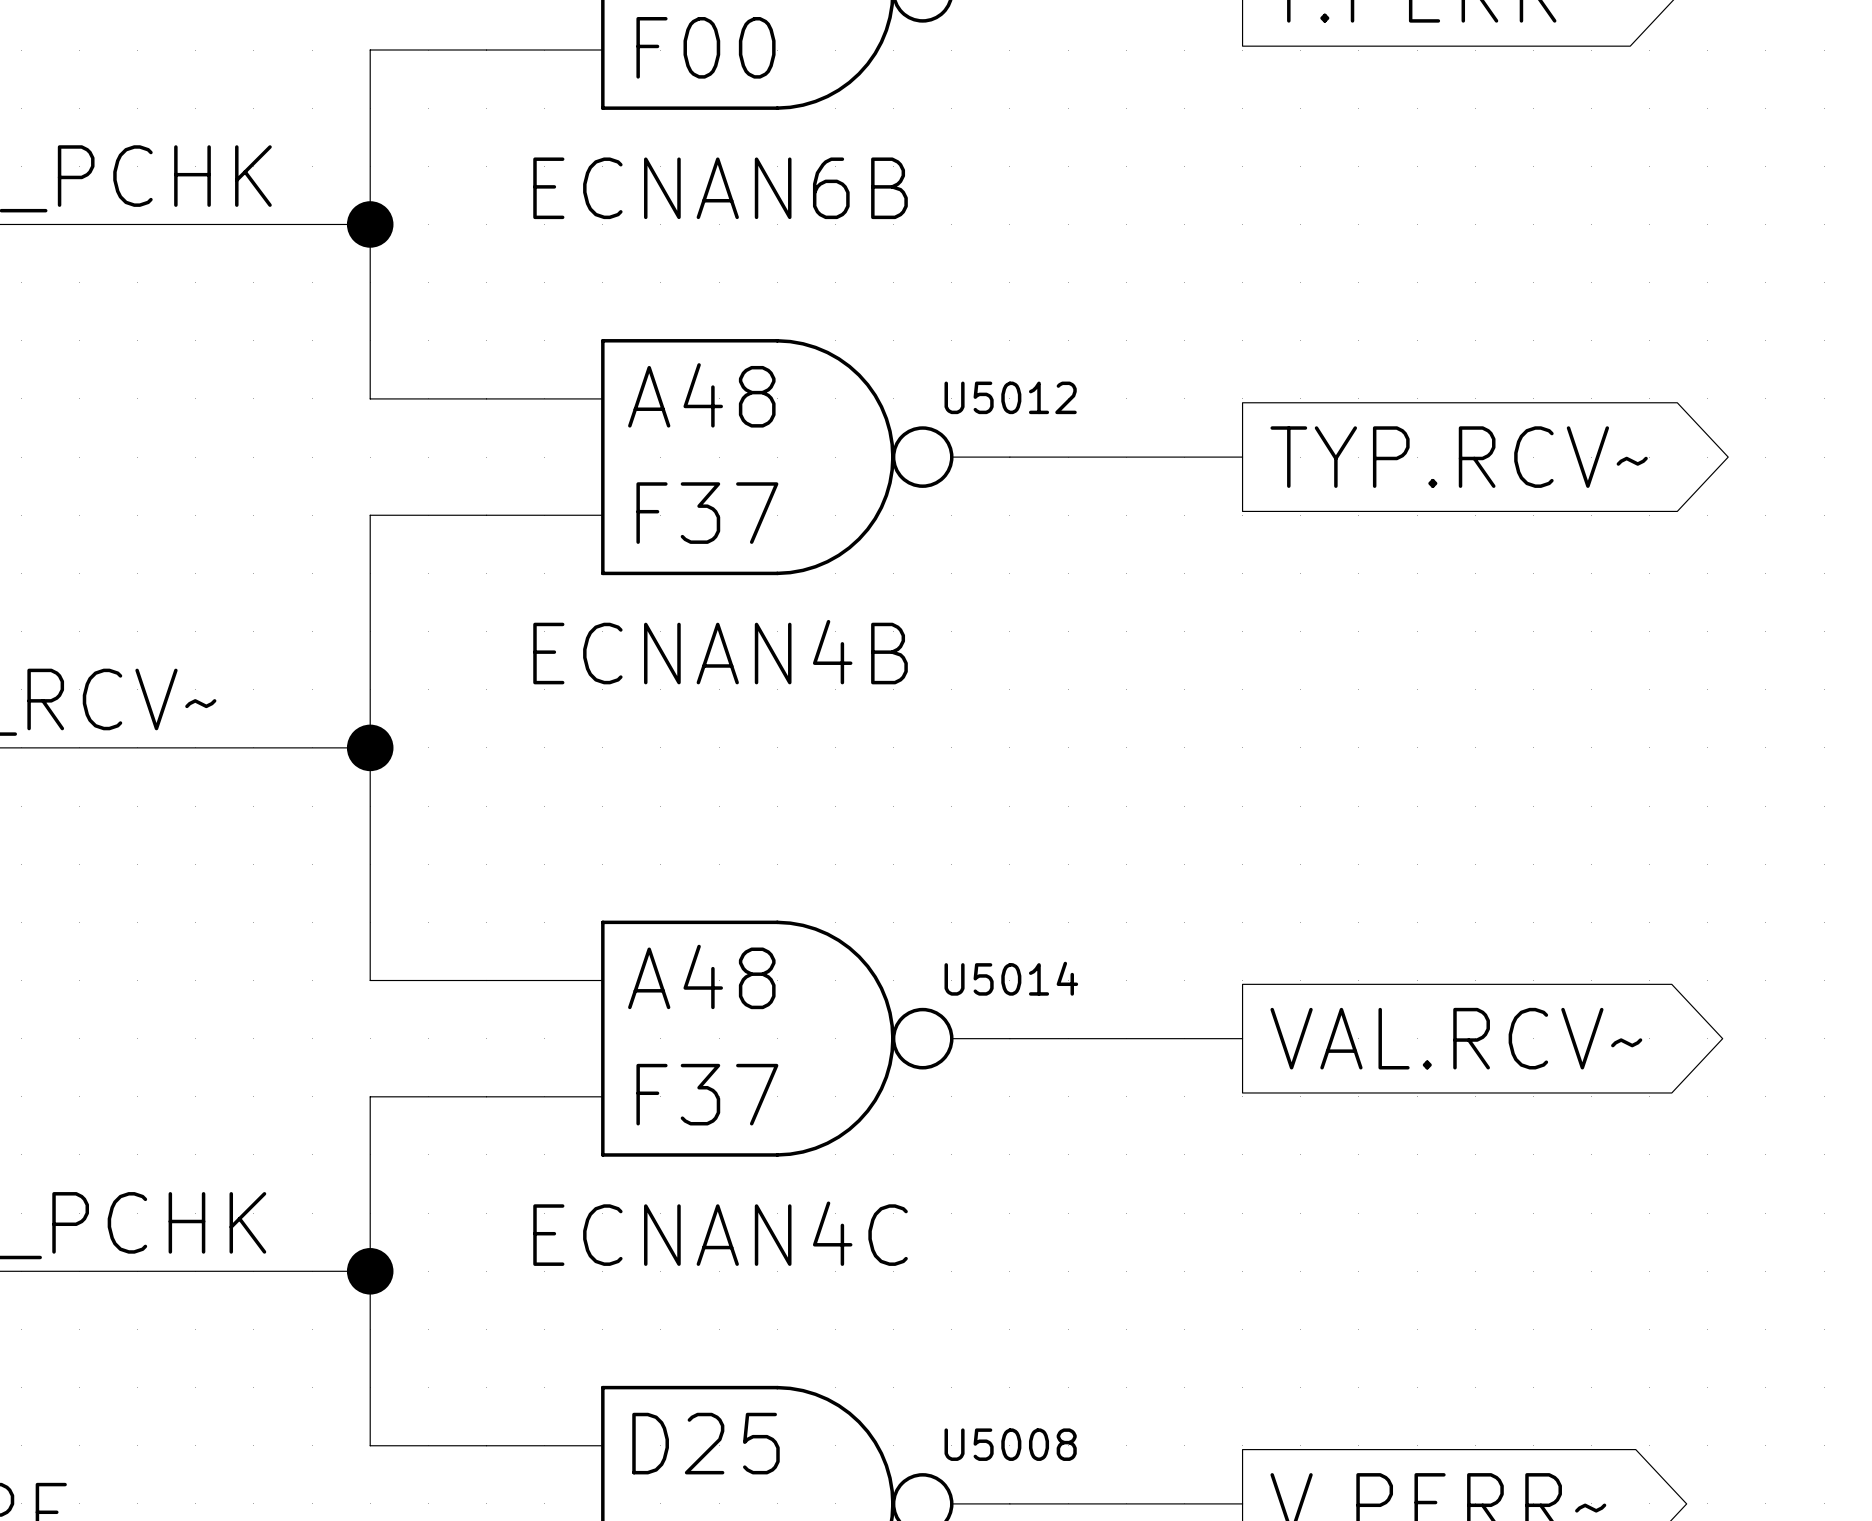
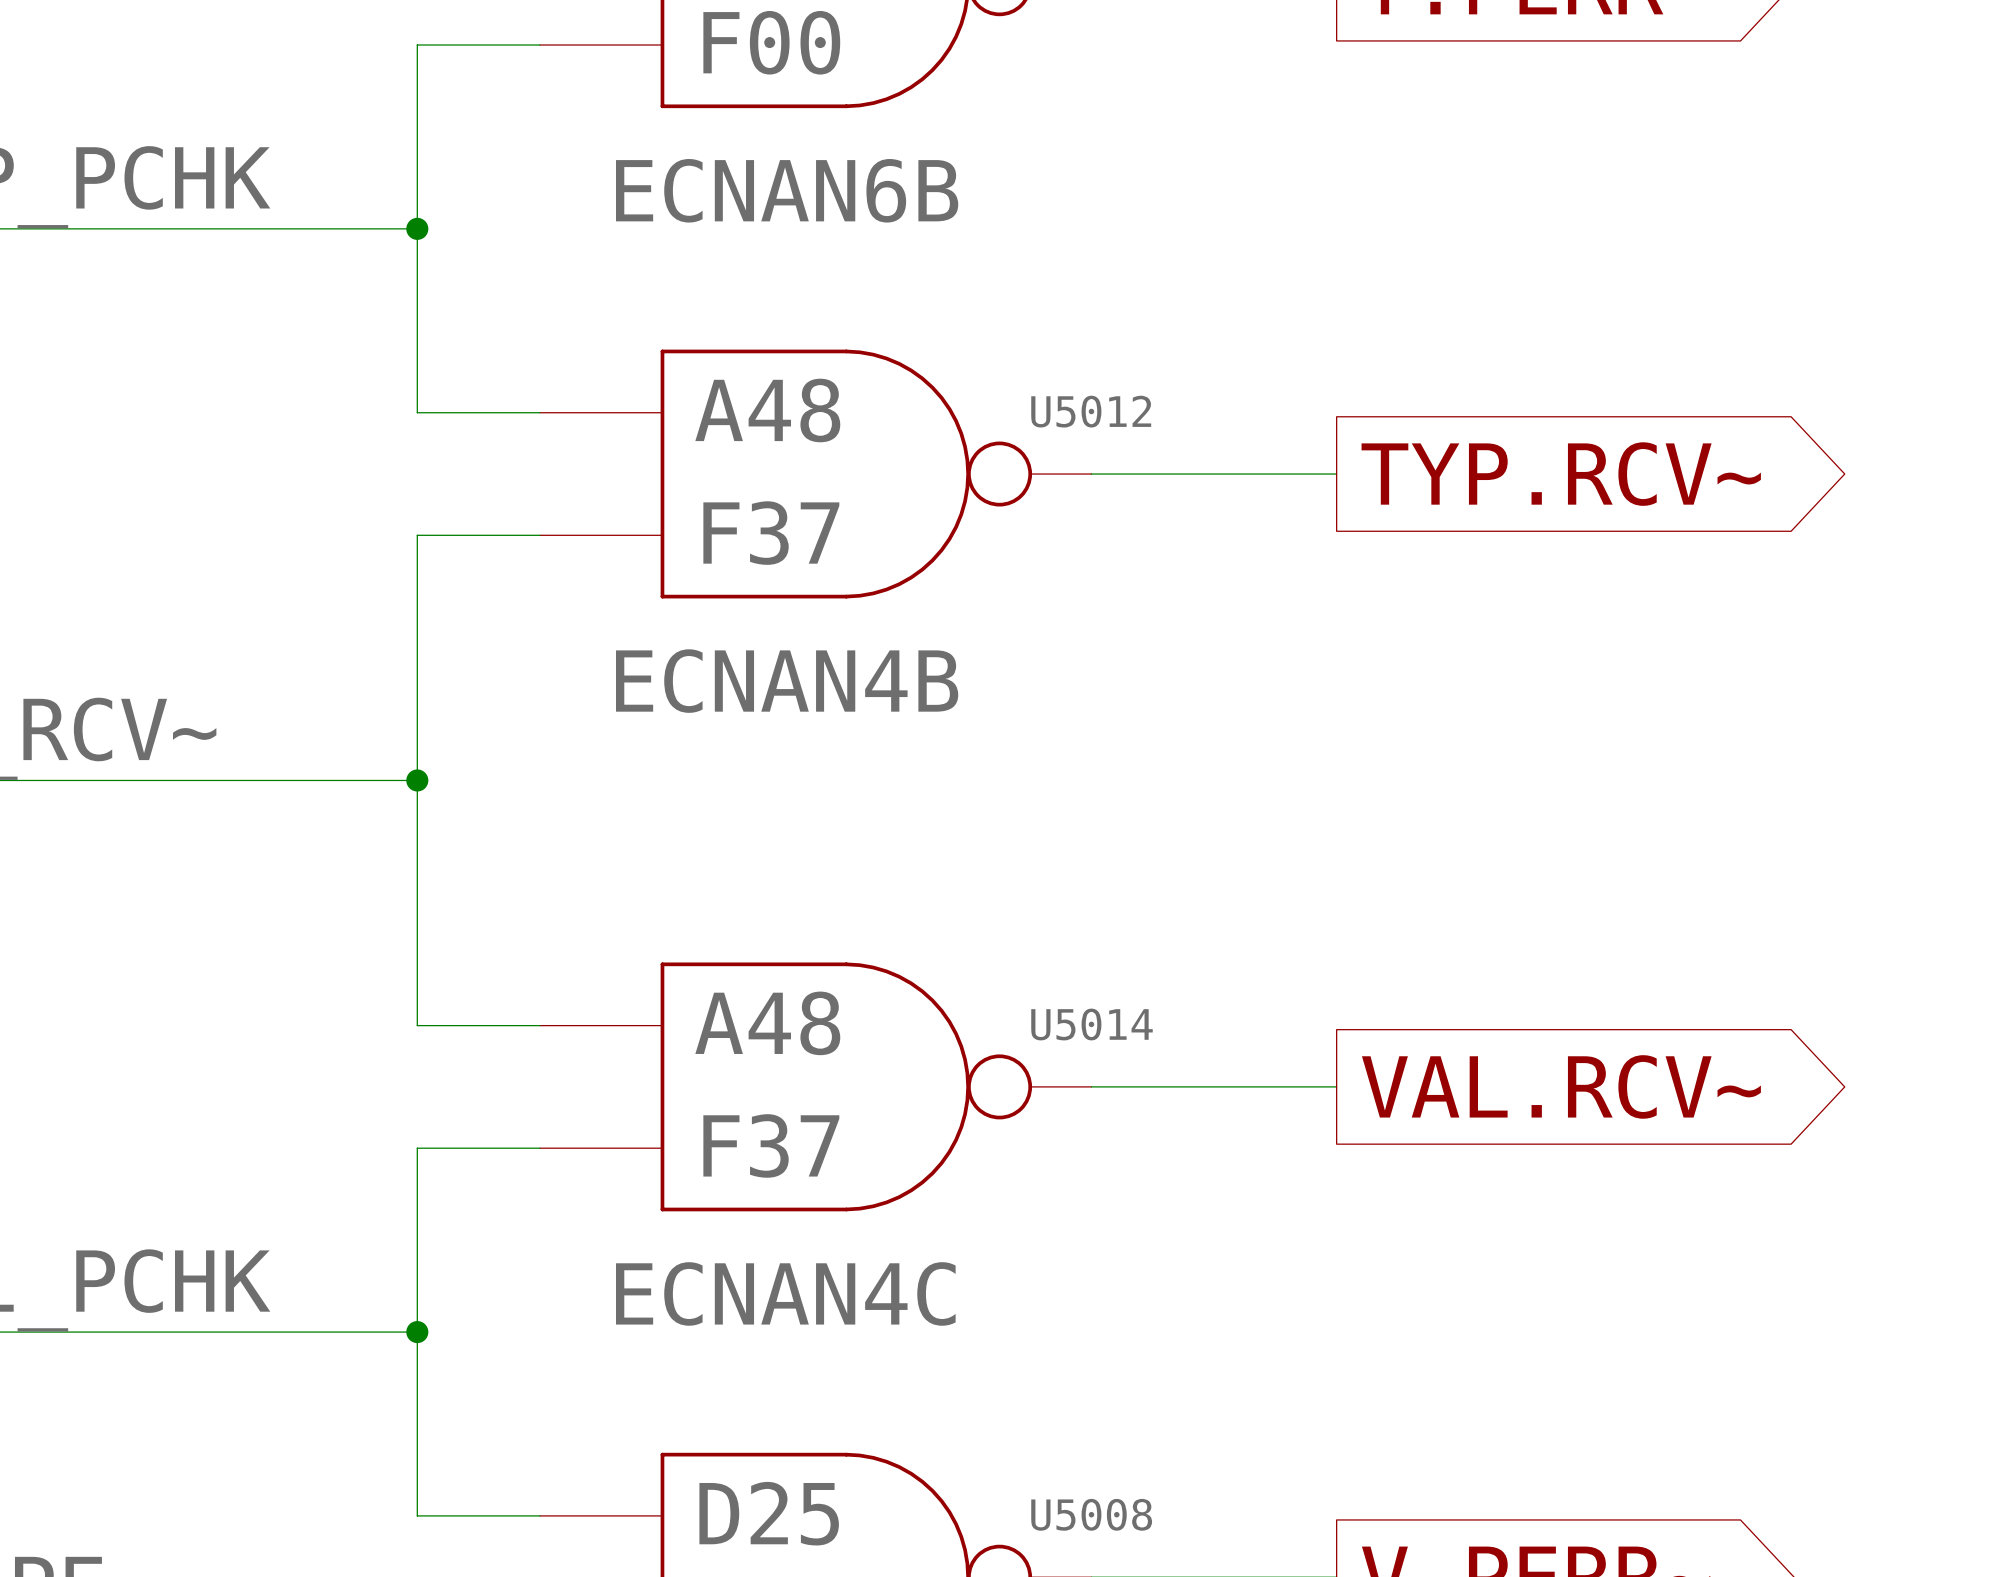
junction size: [346, 201, 394, 248] -> [406, 217, 429, 240]
junction size: [346, 724, 394, 772] -> [406, 769, 429, 792]
junction size: [346, 1248, 394, 1295] -> [406, 1321, 429, 1344]

